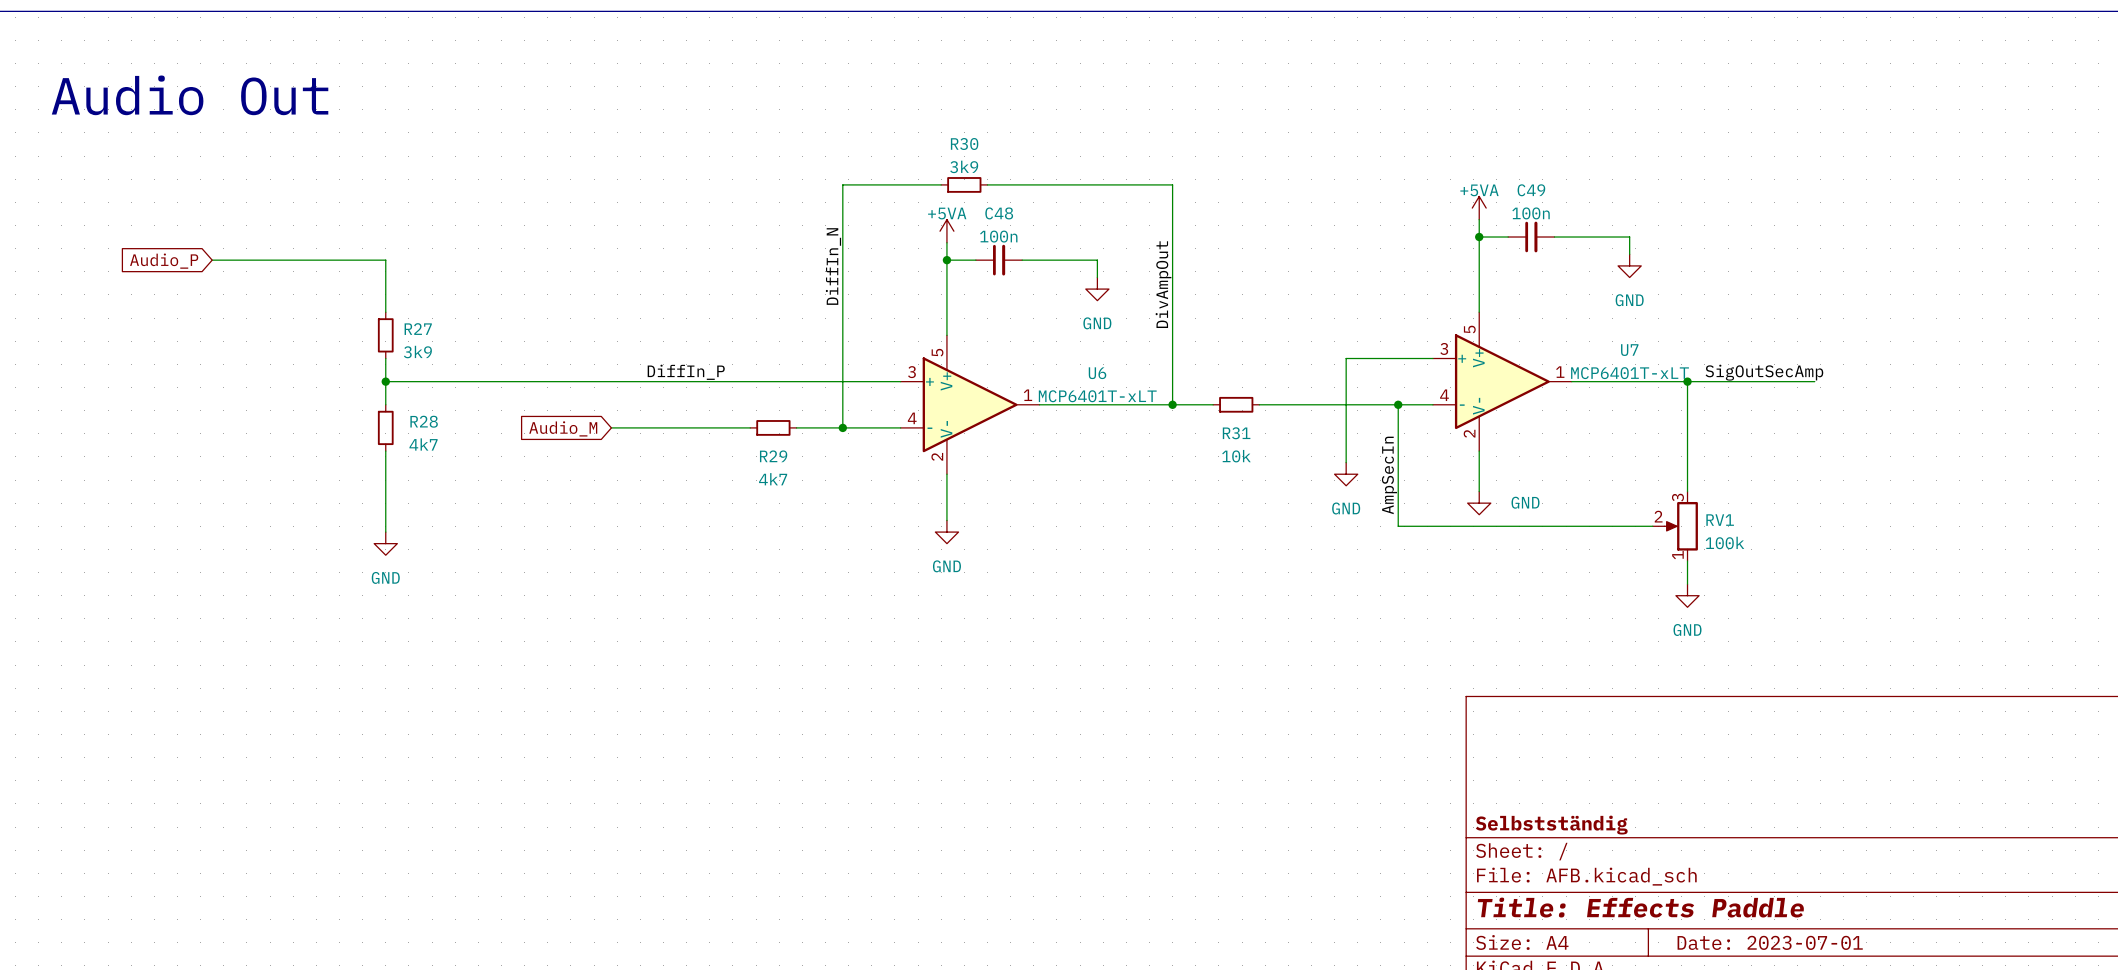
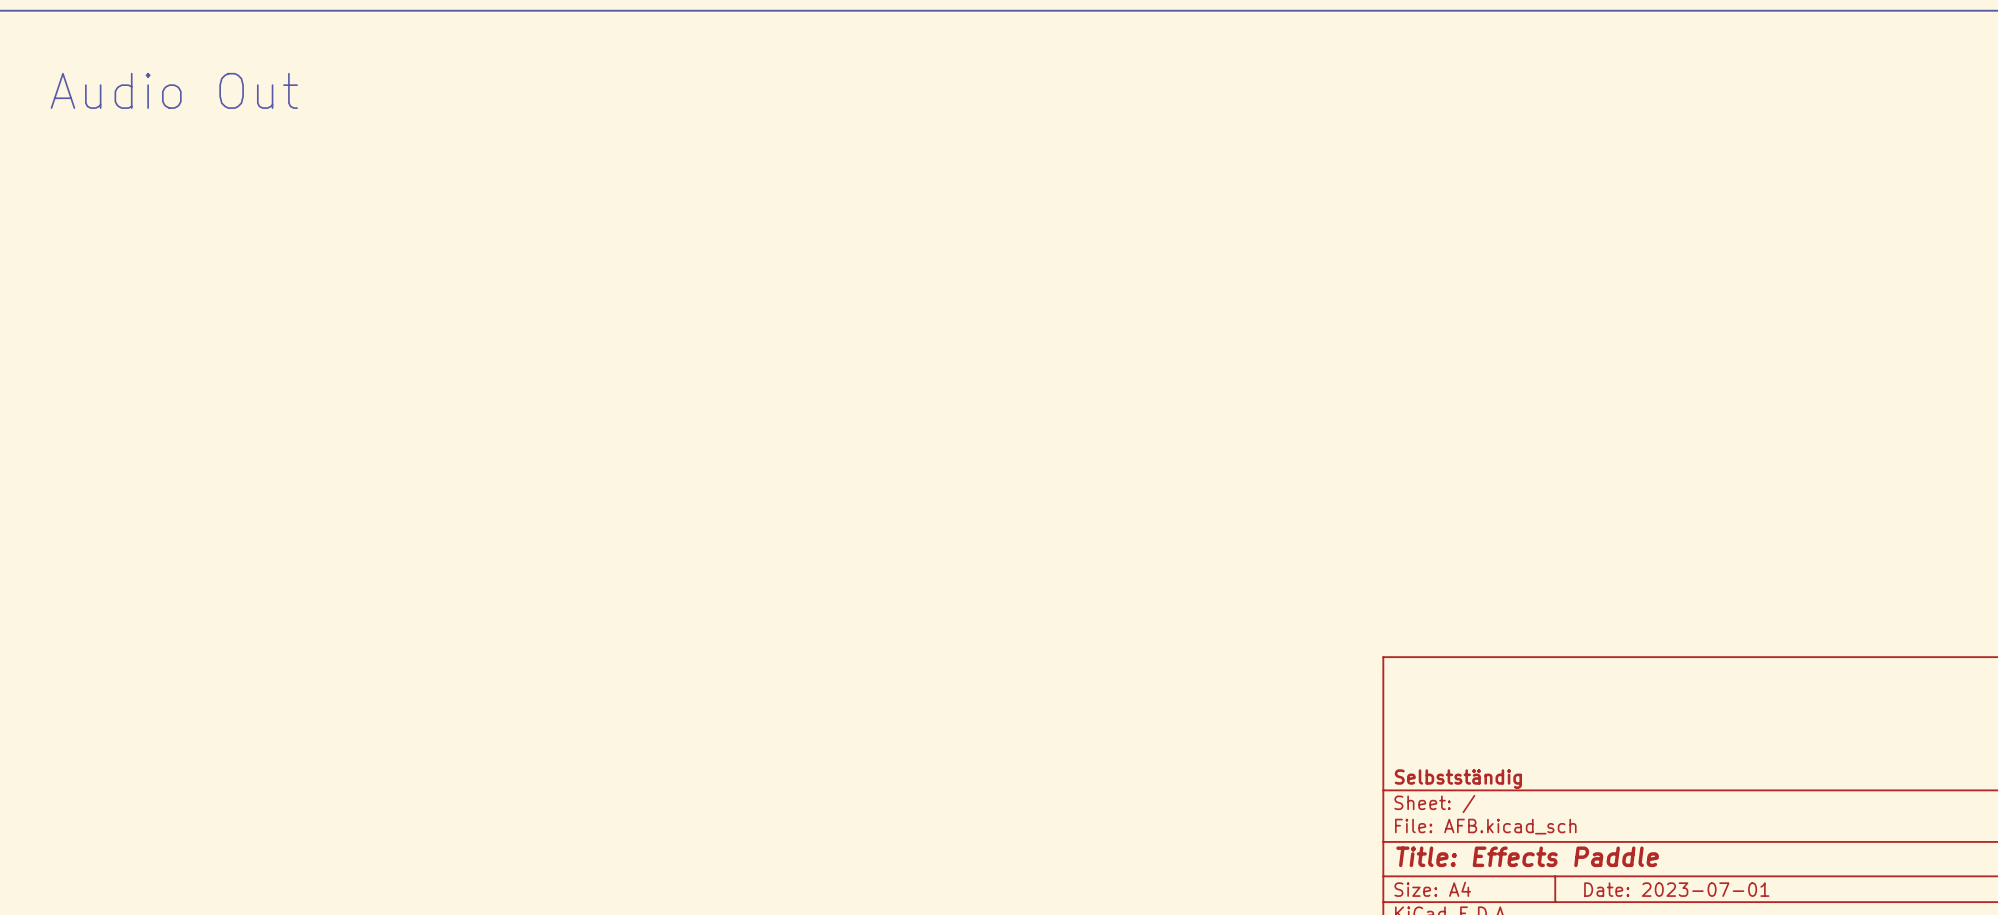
wire: (941, 184) (842, 184) (842, 427) -> none
R30: 3k9 (964, 184) -> none
wire: (987, 184) (1172, 184) (1172, 404) -> none
power symbol: +5VA (1479, 208) -> none
wire: (1479, 219) (1479, 312) -> none
power symbol: +5VA (946, 231) -> none
wire: (1479, 237) (1508, 237) -> none
junction: (1479, 237) -> none
C49: 100n (1531, 237) -> none
wire: (1554, 237) (1629, 237) (1629, 254) -> none
wire: (946, 242) (946, 335) -> none
wire: (212, 260) (385, 260) (385, 312) -> none
wire: (946, 260) (975, 260) -> none
junction: (946, 260) -> none
C48: 100n (999, 260) -> none
wire: (1022, 260) (1097, 260) (1097, 277) -> none
global label: Audio_P (164, 261) -> none
power symbol: GND (1629, 265) -> none
label: DiffIn_N (833, 266) -> none
label: DivAmpOut (1163, 284) -> none
power symbol: GND (1097, 289) -> none
R27: 3k9 (385, 335) -> none
wire: (385, 358) (385, 404) -> none
wire: (1432, 358) (1346, 358) (1346, 462) -> none
label: DiffIn_P (686, 372) -> none
label: SigOutSecAmp (1764, 372) -> none
wire: (385, 381) (900, 381) -> none
junction: (385, 381) -> none
U7: MCP6401T-xLT (1502, 381) -> none
wire: (1571, 381) (1814, 381) -> none
wire: (1687, 381) (1687, 491) -> none
junction: (1687, 381) -> none
U6: MCP6401T-xLT (970, 404) -> none
wire: (1039, 404) (1213, 404) -> none
junction: (1172, 404) -> none
R31: 10k (1236, 404) -> none
wire: (1259, 404) (1432, 404) -> none
wire: (1398, 404) (1398, 526) (1652, 526) -> none
junction: (1398, 404) -> none
R28: 4k7 (385, 427) -> none
wire: (611, 427) (750, 427) -> none
R29: 4k7 (773, 427) -> none
wire: (796, 427) (900, 427) -> none
junction: (842, 427) -> none
global label: Audio_M (563, 428) -> none
wire: (385, 451) (385, 532) -> none
wire: (1479, 451) (1479, 491) -> none
wire: (946, 474) (946, 520) -> none
power symbol: GND (1346, 474) -> none
label: AmpSecIn (1389, 475) -> none
power symbol: GND (1479, 503) -> none
RV1: 100k (1675, 526) -> none
power symbol: GND (946, 532) -> none
power symbol: GND (385, 543) -> none
wire: (1687, 561) (1687, 584) -> none
power symbol: GND (1687, 595) -> none

